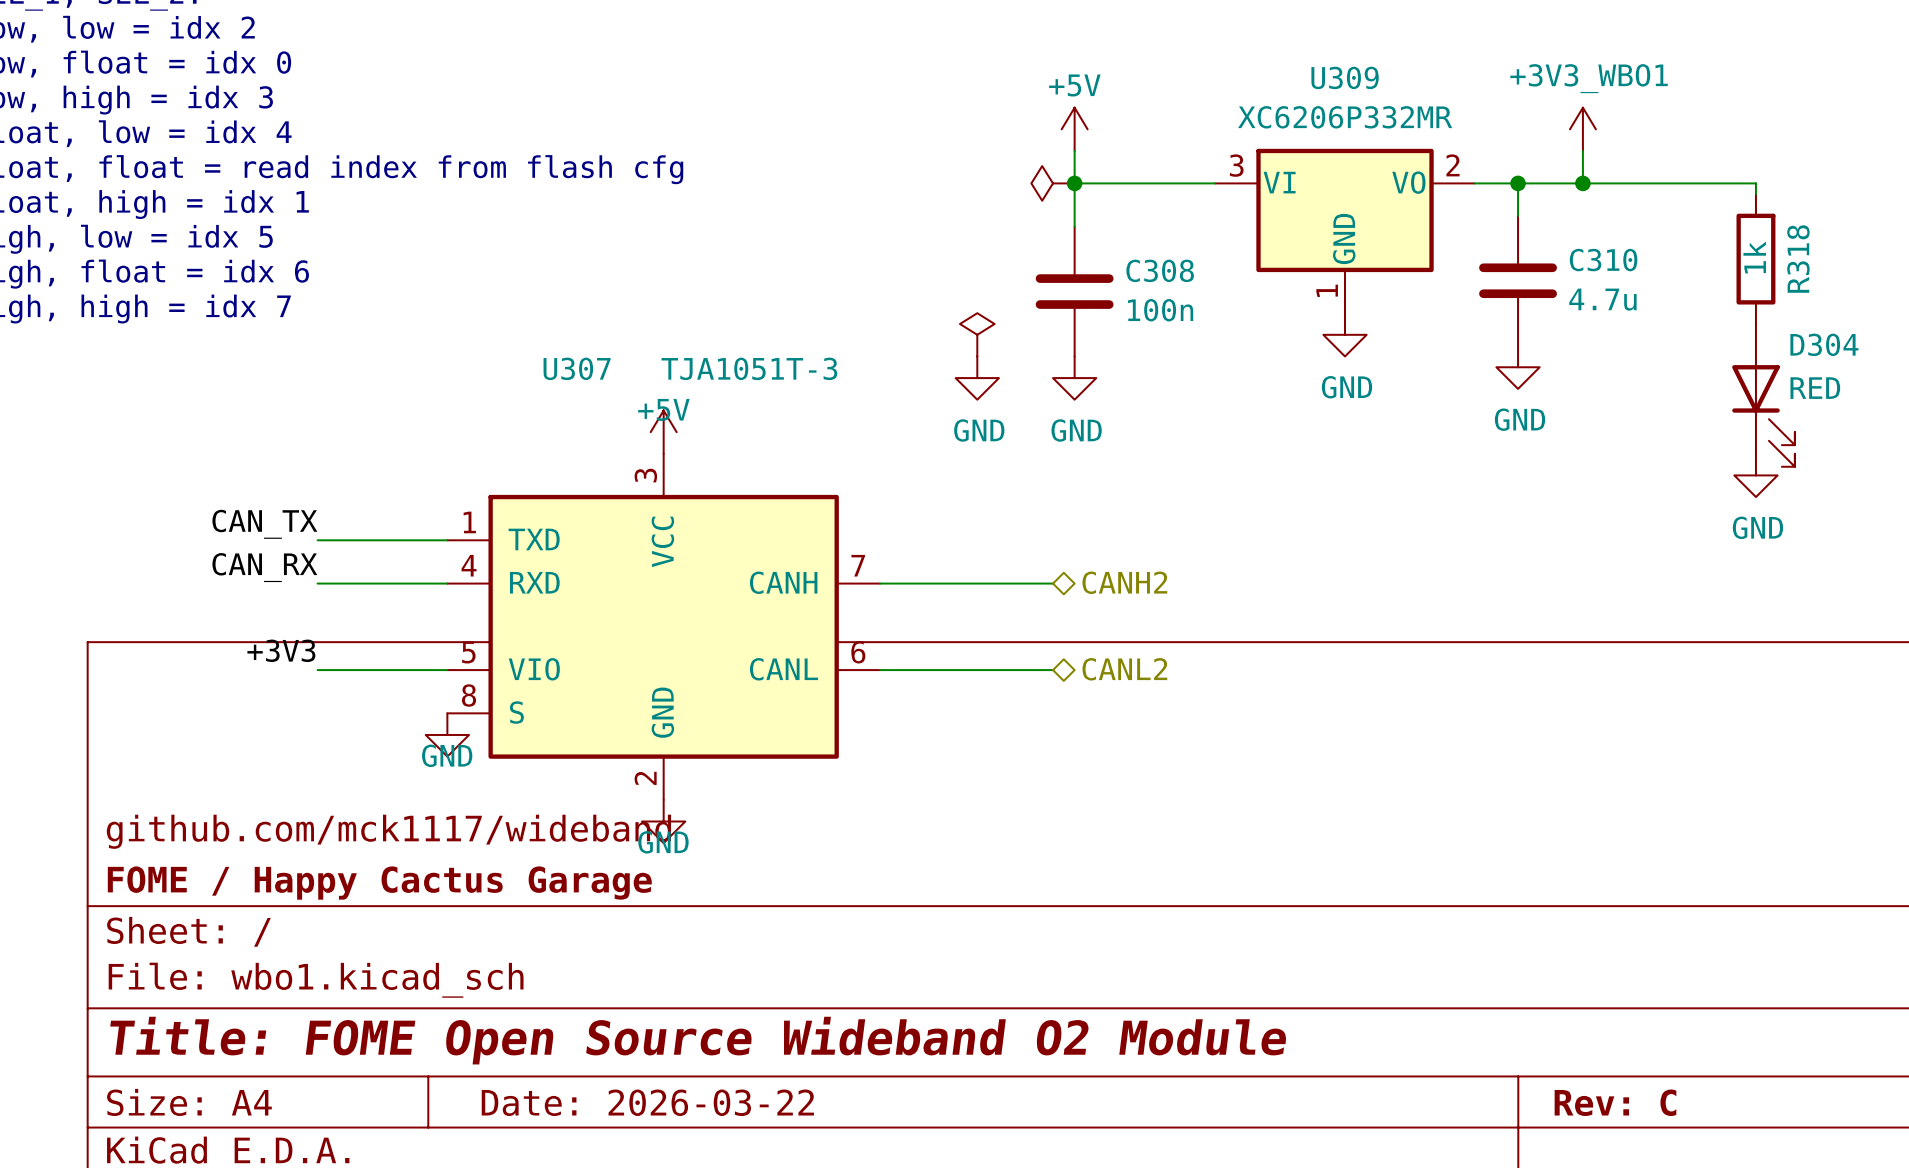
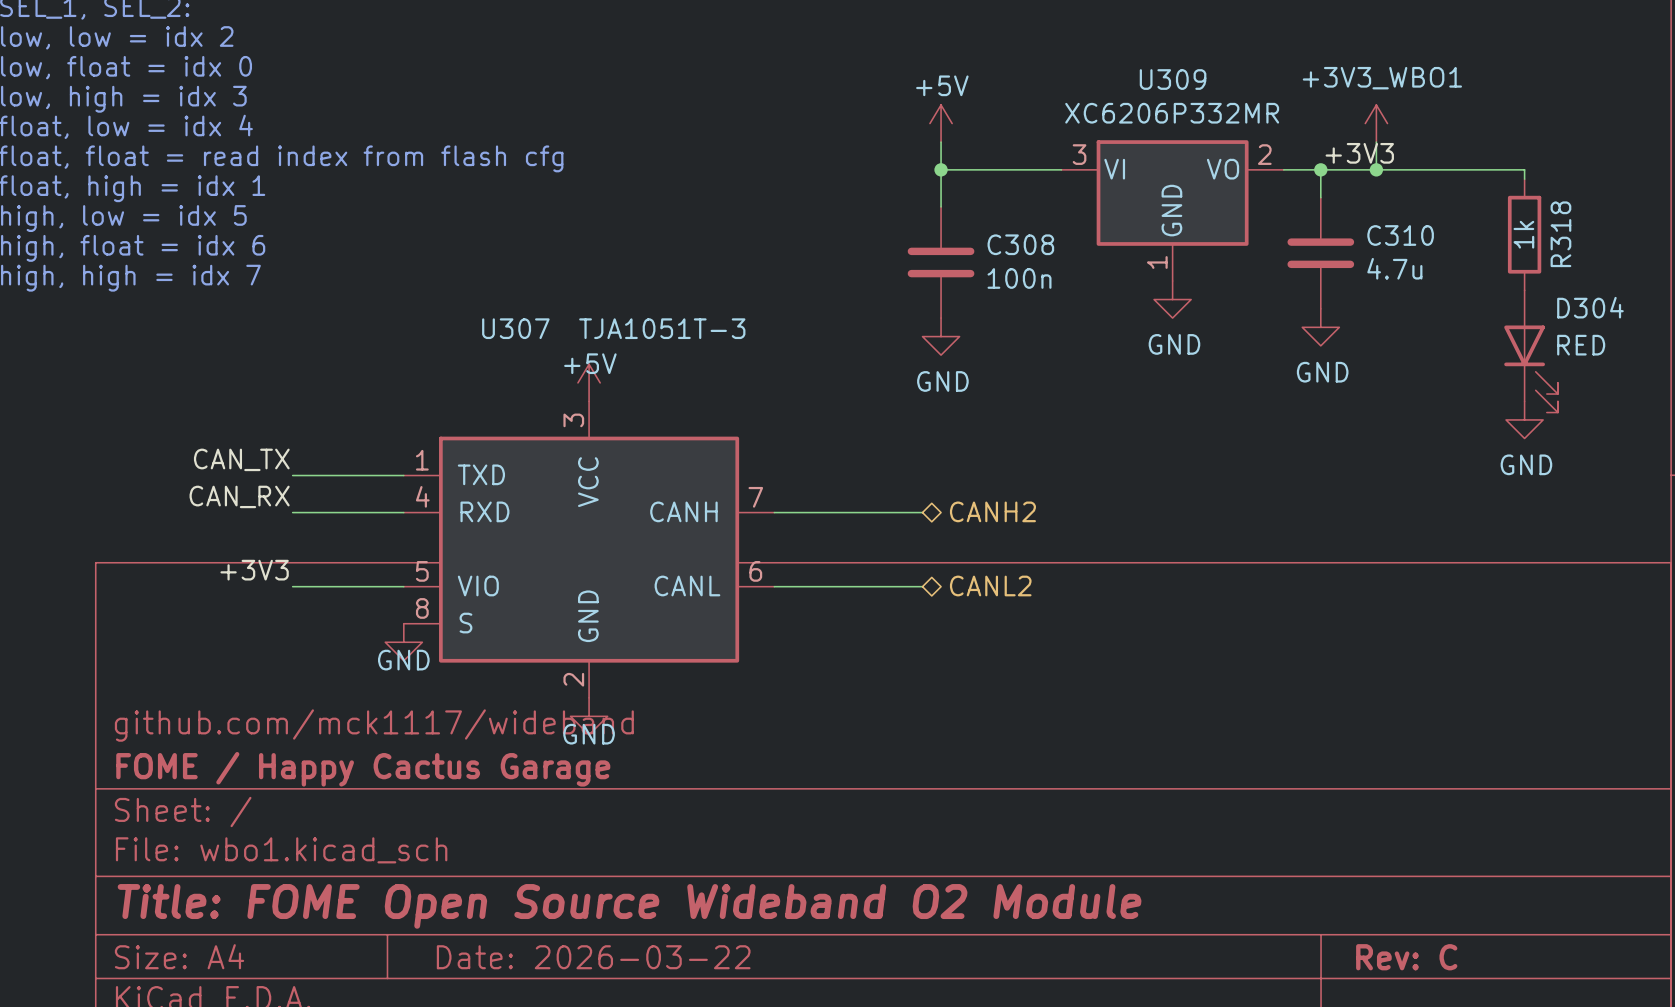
label: none -> +3V3 (1359, 153)
power symbol: (1053, 183) -> none
power symbol: (977, 334) -> none
power symbol: GND (977, 378) -> none

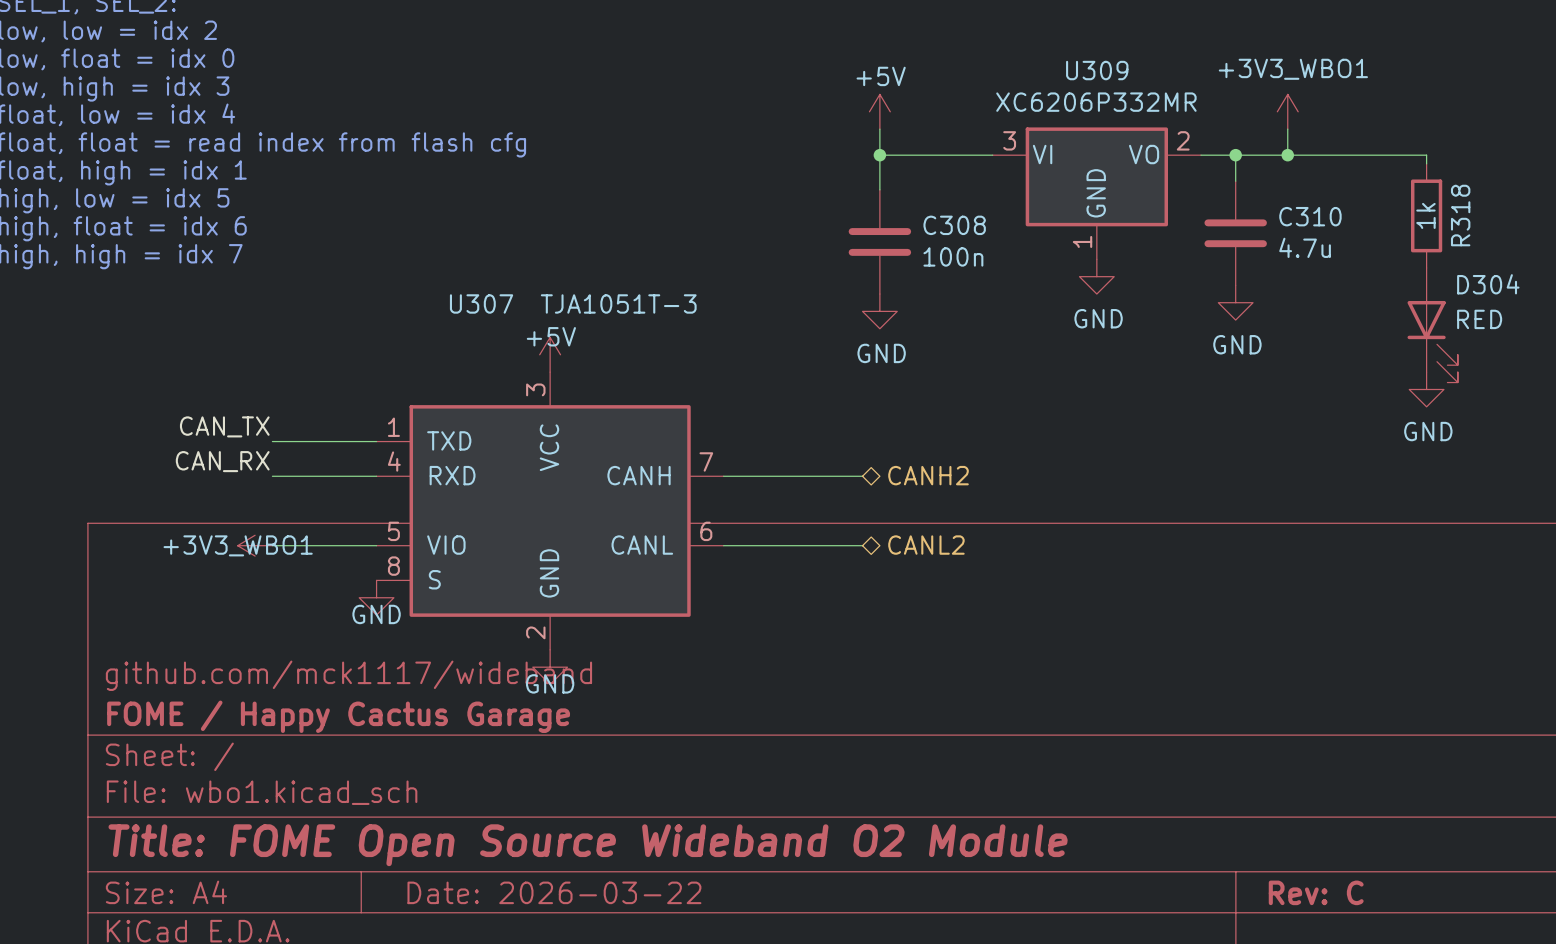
label: +3V3 (1359, 153) -> none
label: +3V3 (254, 570) -> none
power symbol: none -> +3V3_WBO1 (255, 545)

